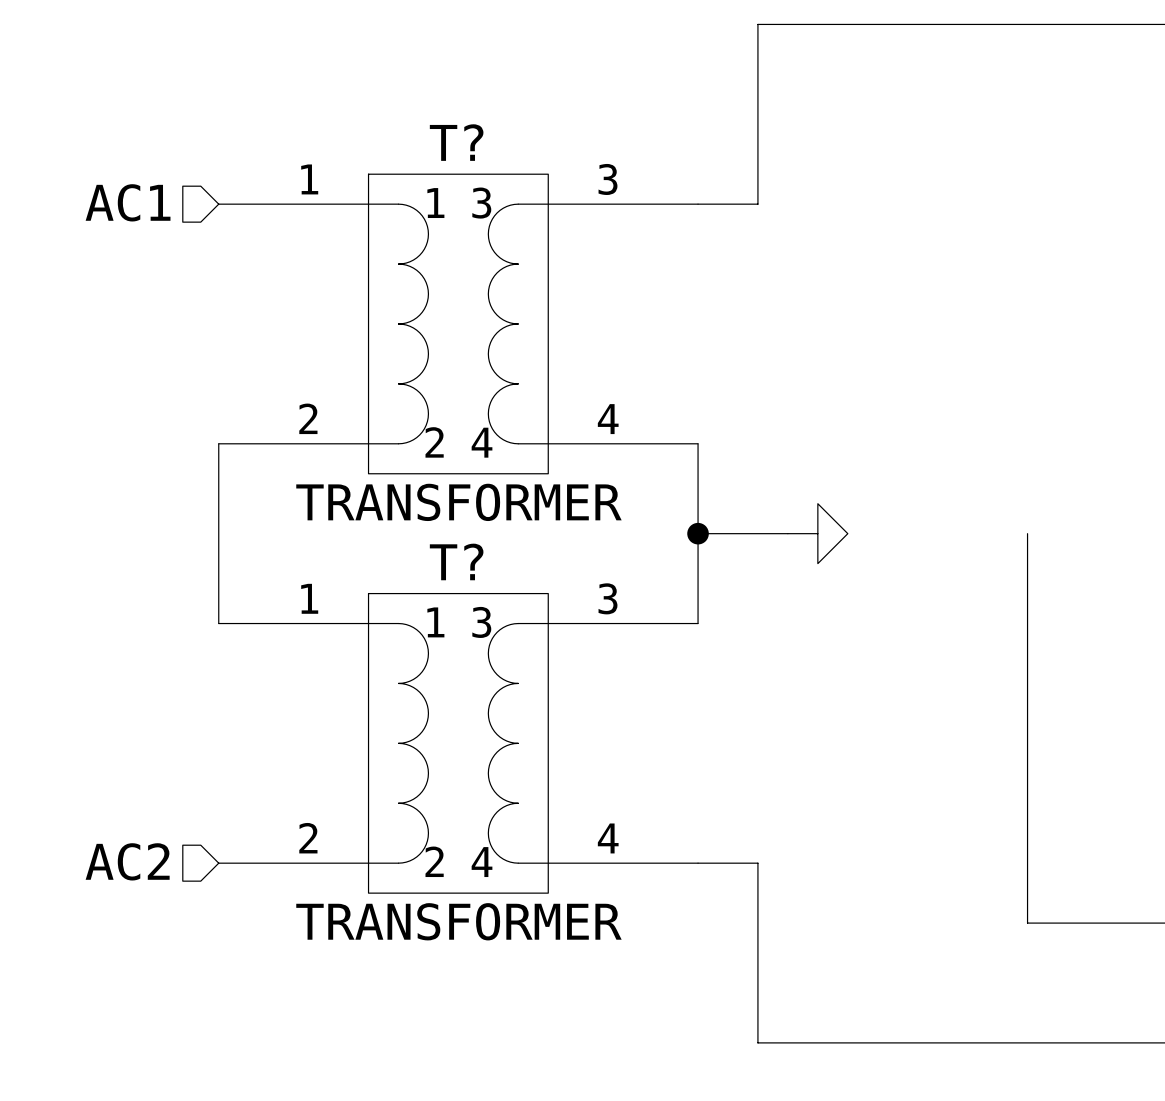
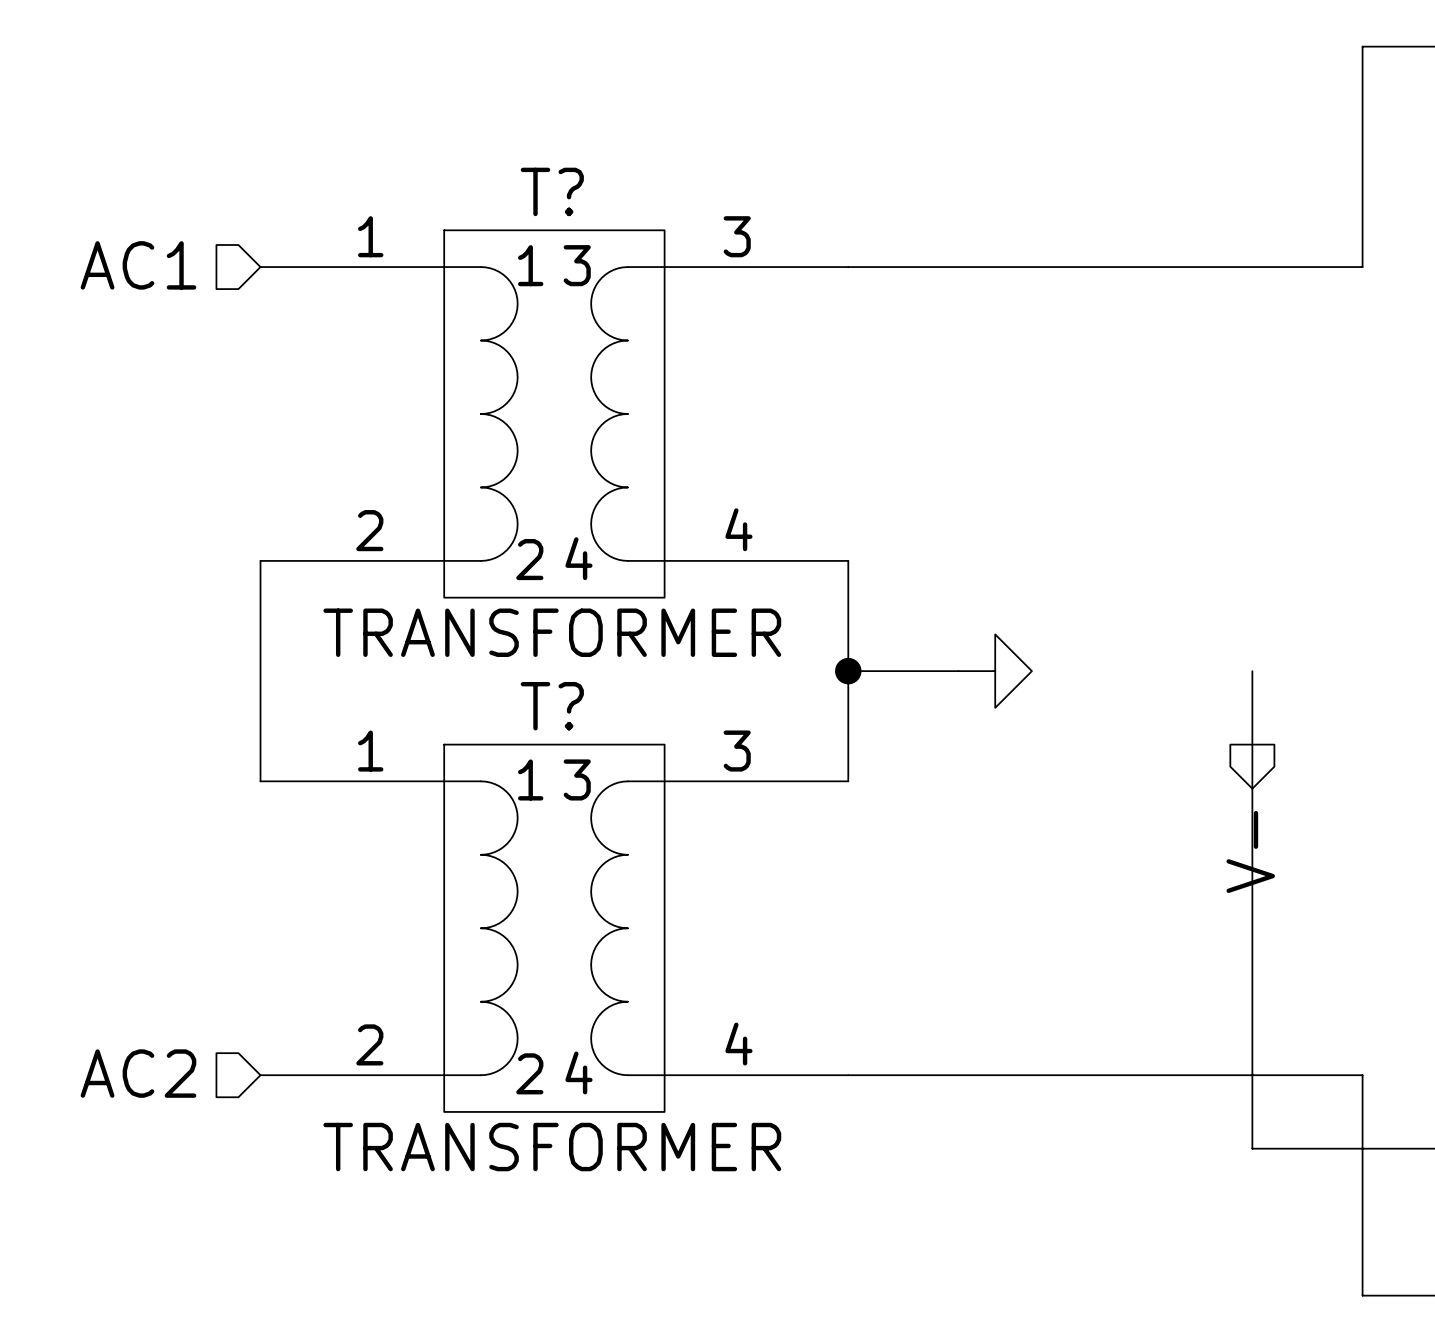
wire: (1117, 24) (757, 24) (757, 204) -> (1362, 46) (1362, 267) (921, 267)
hierarchical label: none -> V- (1250, 851)
wire: (757, 863) (757, 1042) (1117, 1042) -> (921, 1075) (1362, 1075) (1362, 1295)

